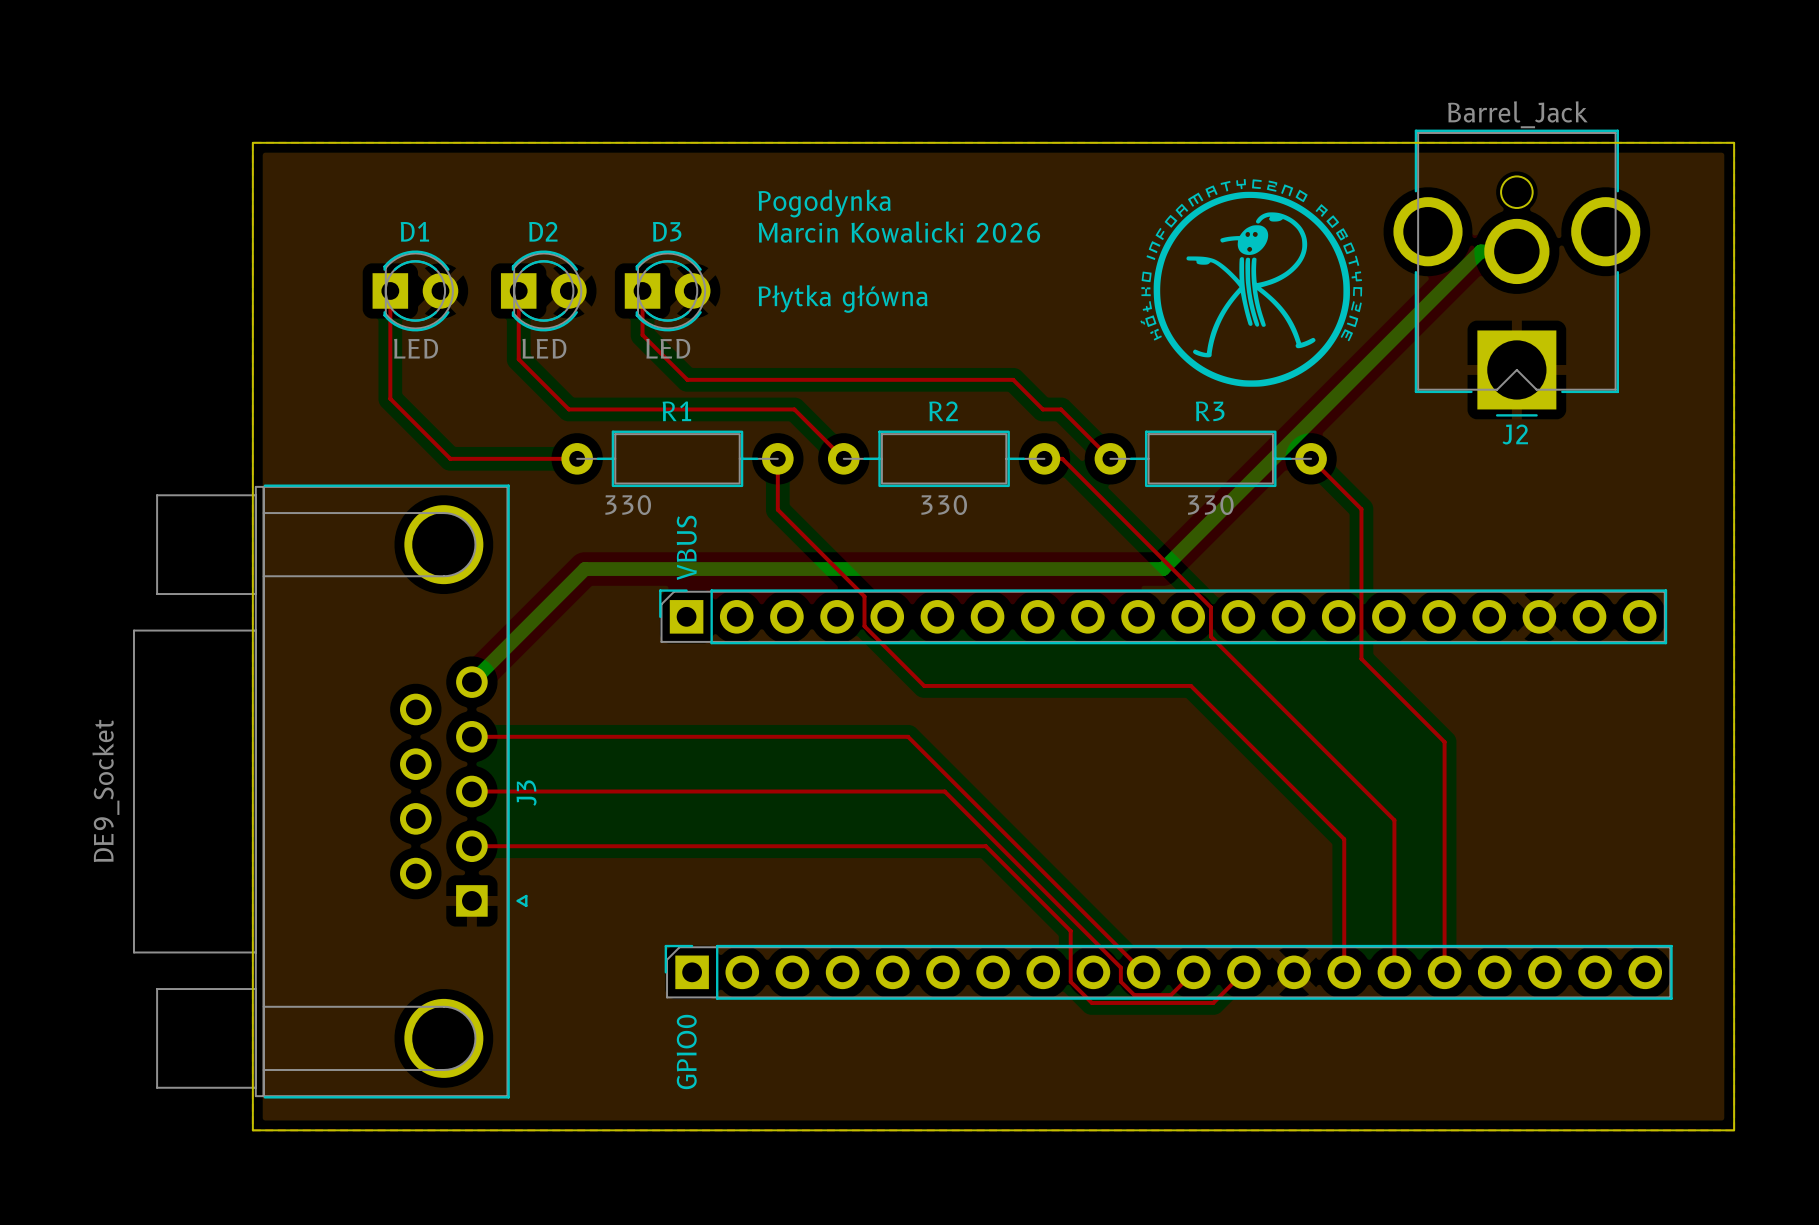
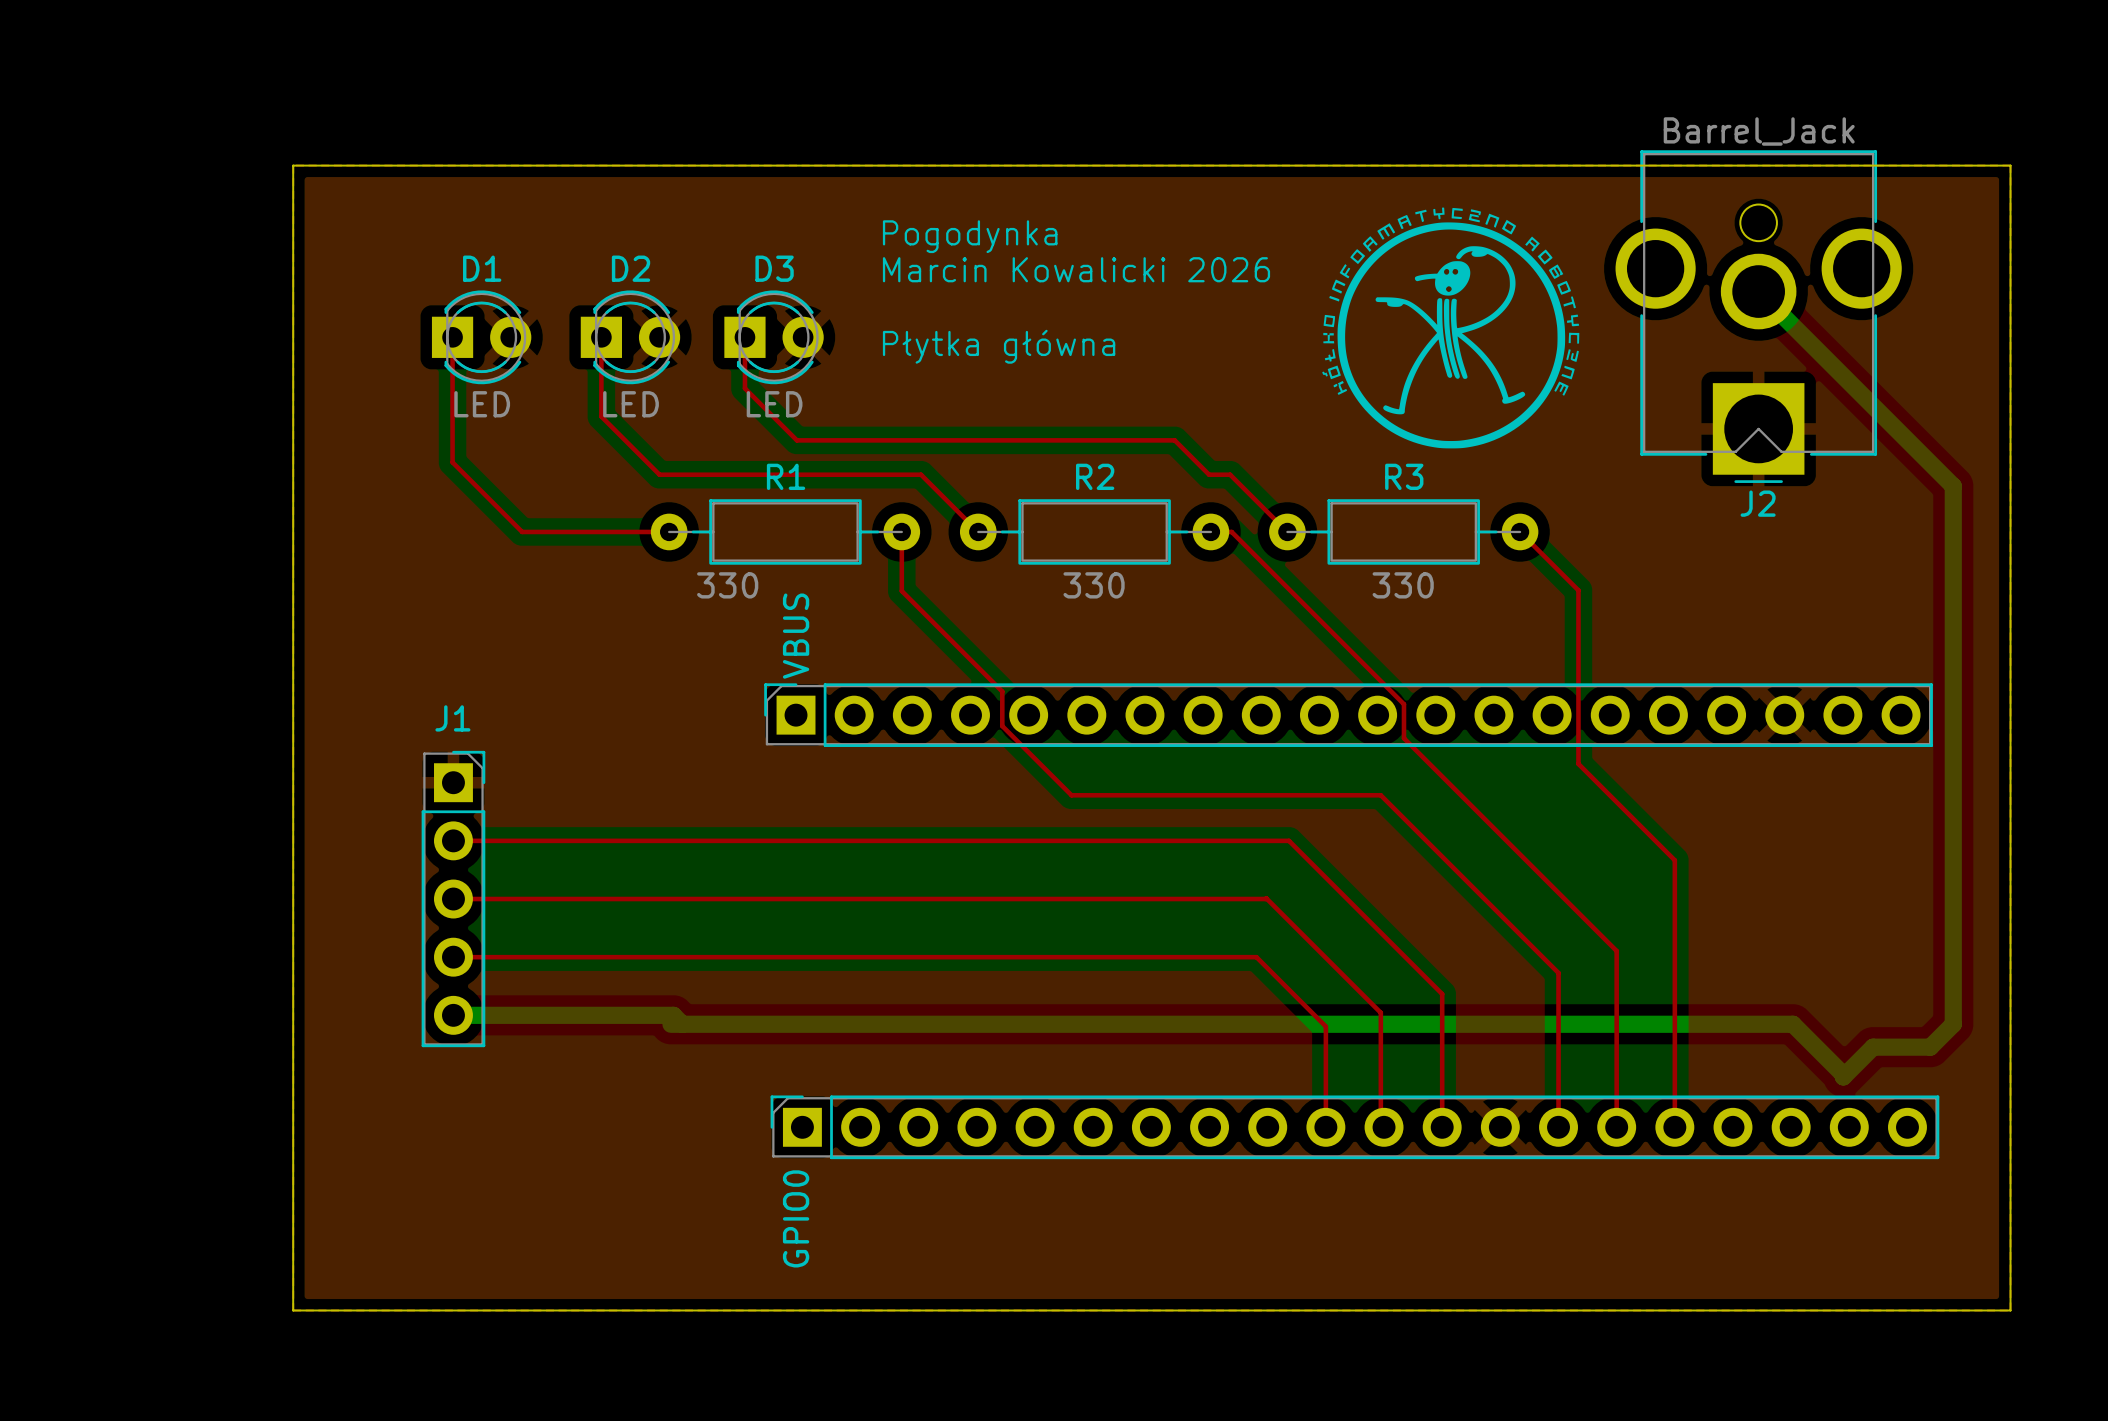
bottom track: (1516, 251) (1480, 251) (1163, 569) (584, 569) (471, 682) -> (1758, 291) (1953, 486) (1953, 1024) (1930, 1047) (1873, 1047) (1843, 1076) (1843, 1074) (1792, 1024) (671, 1024)
top track: (471, 736) (908, 736) (1143, 972) -> (453, 957) (1256, 957) (1325, 1026) (1325, 1127)
J1: none -> (453, 899)
J3: DE9_Socket (330, 791) -> none
top track: (471, 791) (944, 791) (1120, 967) (1120, 981) (1134, 995) (1171, 995) (1193, 972) -> (453, 899) (1266, 898) (1380, 1012) (1380, 1124) (1384, 1127)
top track: (471, 846) (985, 846) (1070, 931) (1070, 981) (1091, 1002) (1213, 1002) (1243, 972) -> (453, 840) (1289, 840) (1442, 994) (1442, 1127)
bottom track: none -> (453, 1015) (673, 1015) (682, 1024)

